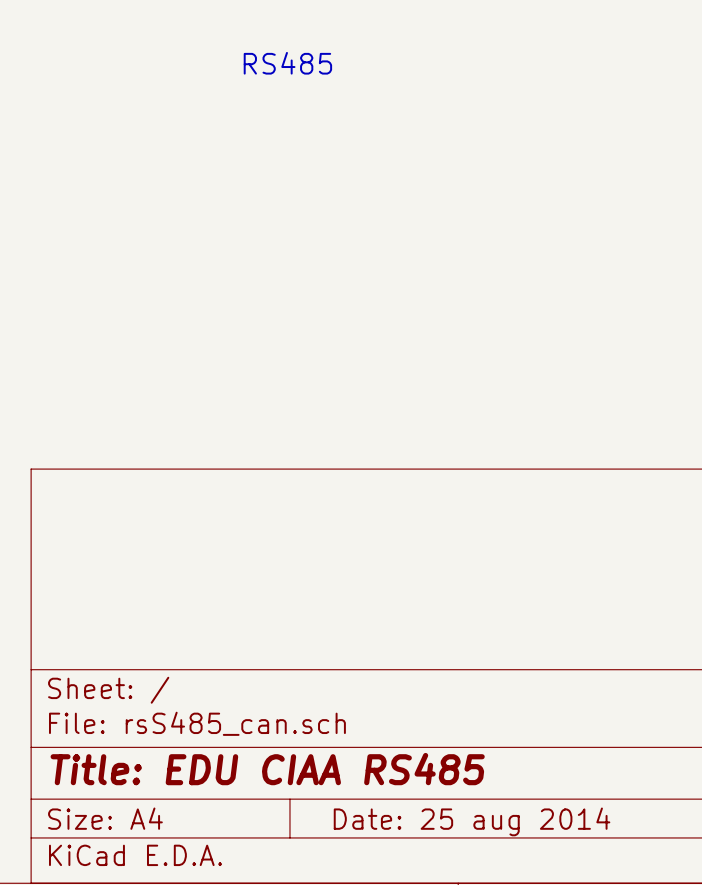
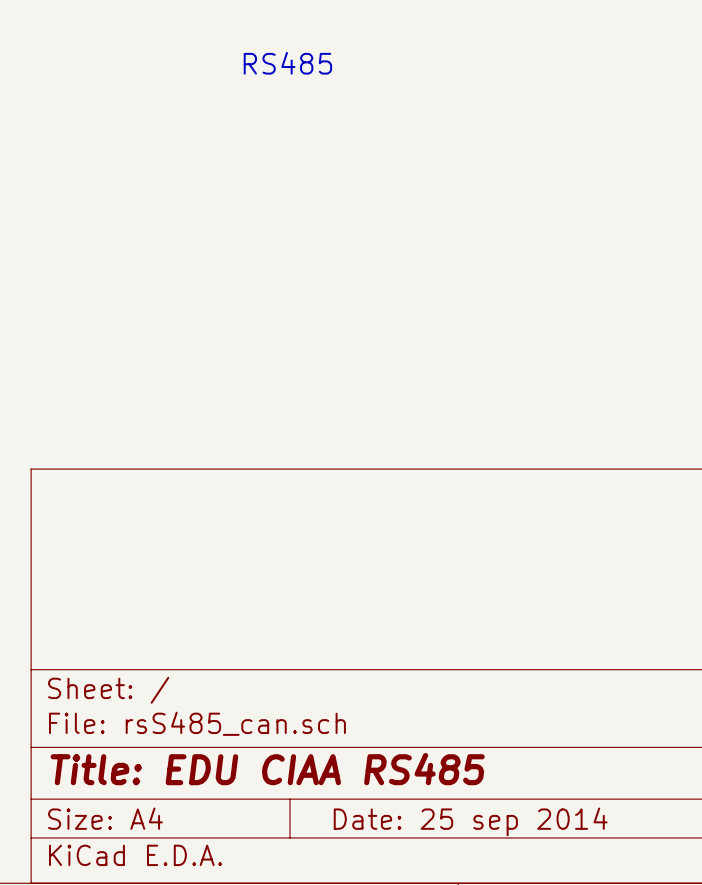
title block: Date: 25 aug 2014 (472, 821) -> Date: 25 sep 2014 (470, 821)

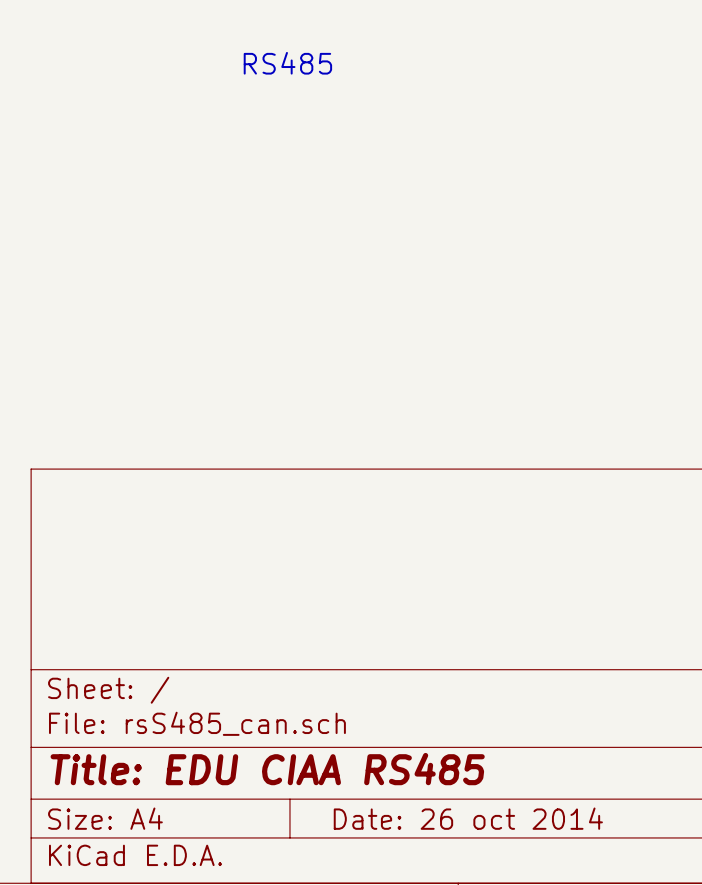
title block: Date: 25 sep 2014 (470, 821) -> Date: 26 oct 2014 (468, 818)

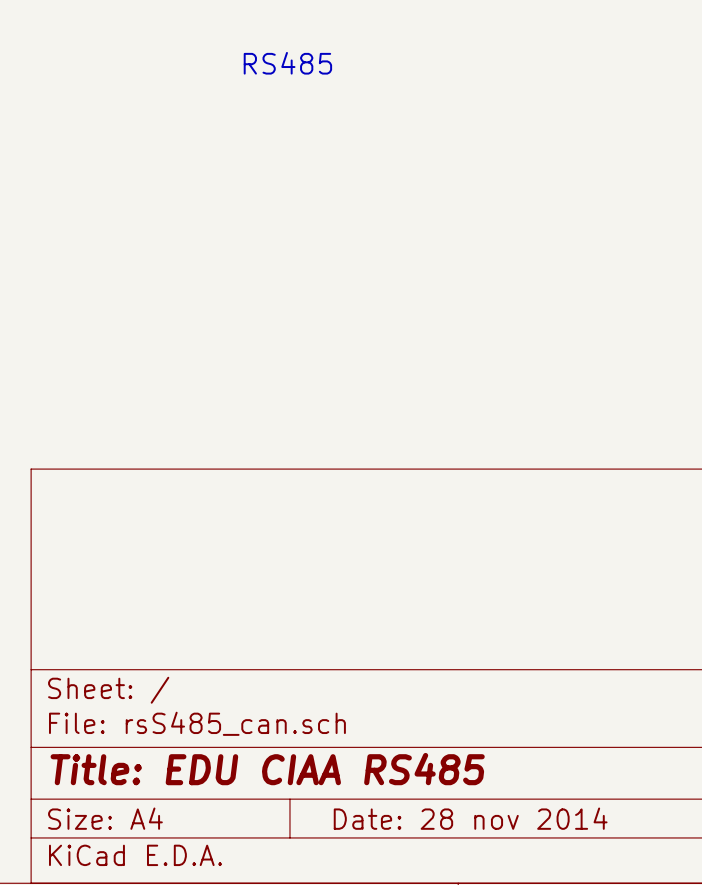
title block: Date: 26 oct 2014 (468, 818) -> Date: 28 nov 2014 (470, 818)

